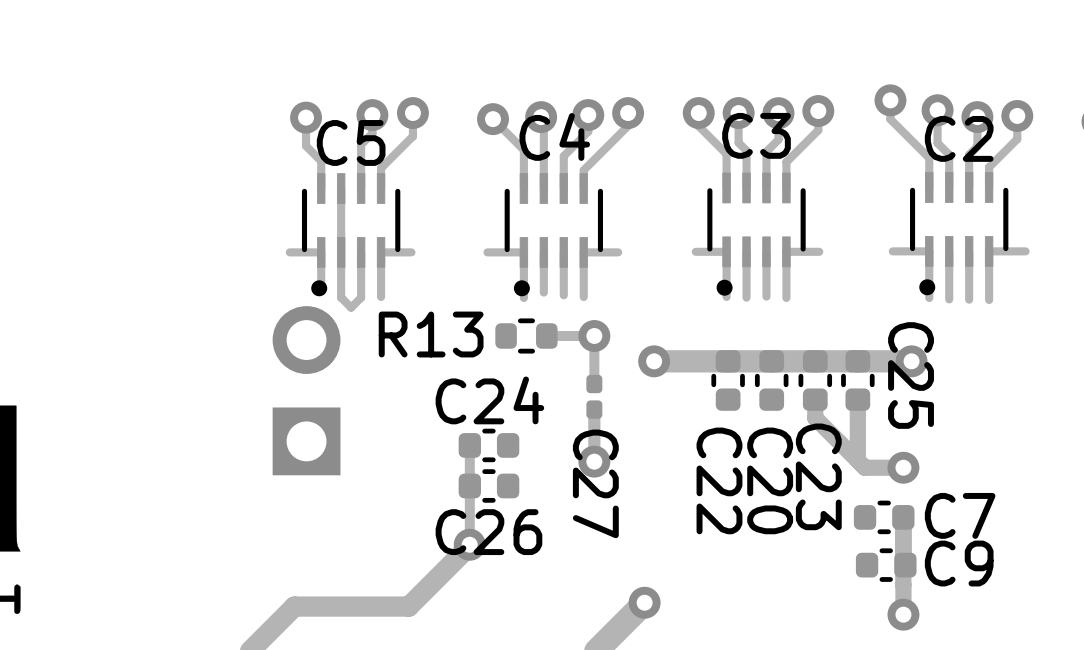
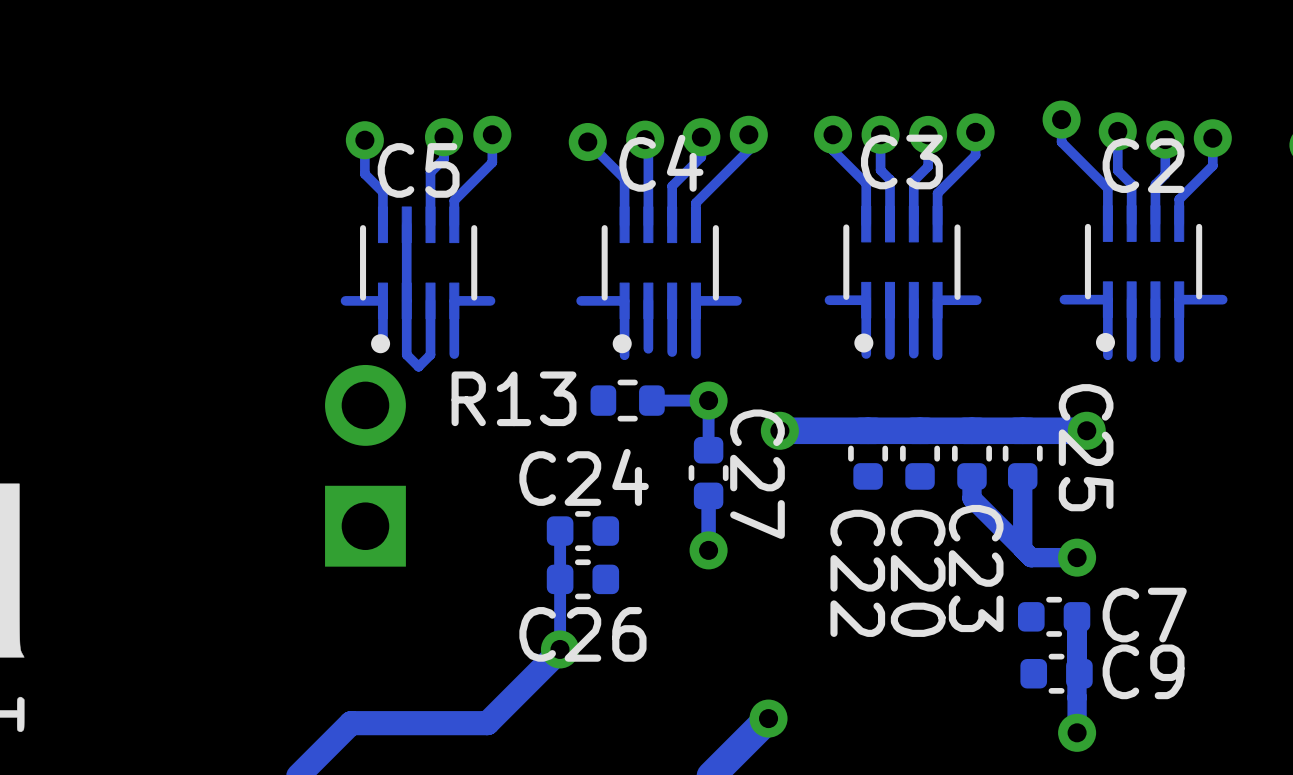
C27 footprint: [586, 374, 603, 419] -> [688, 436, 729, 510]
C27 name position: C27 (595, 483) -> C27 (757, 474)

